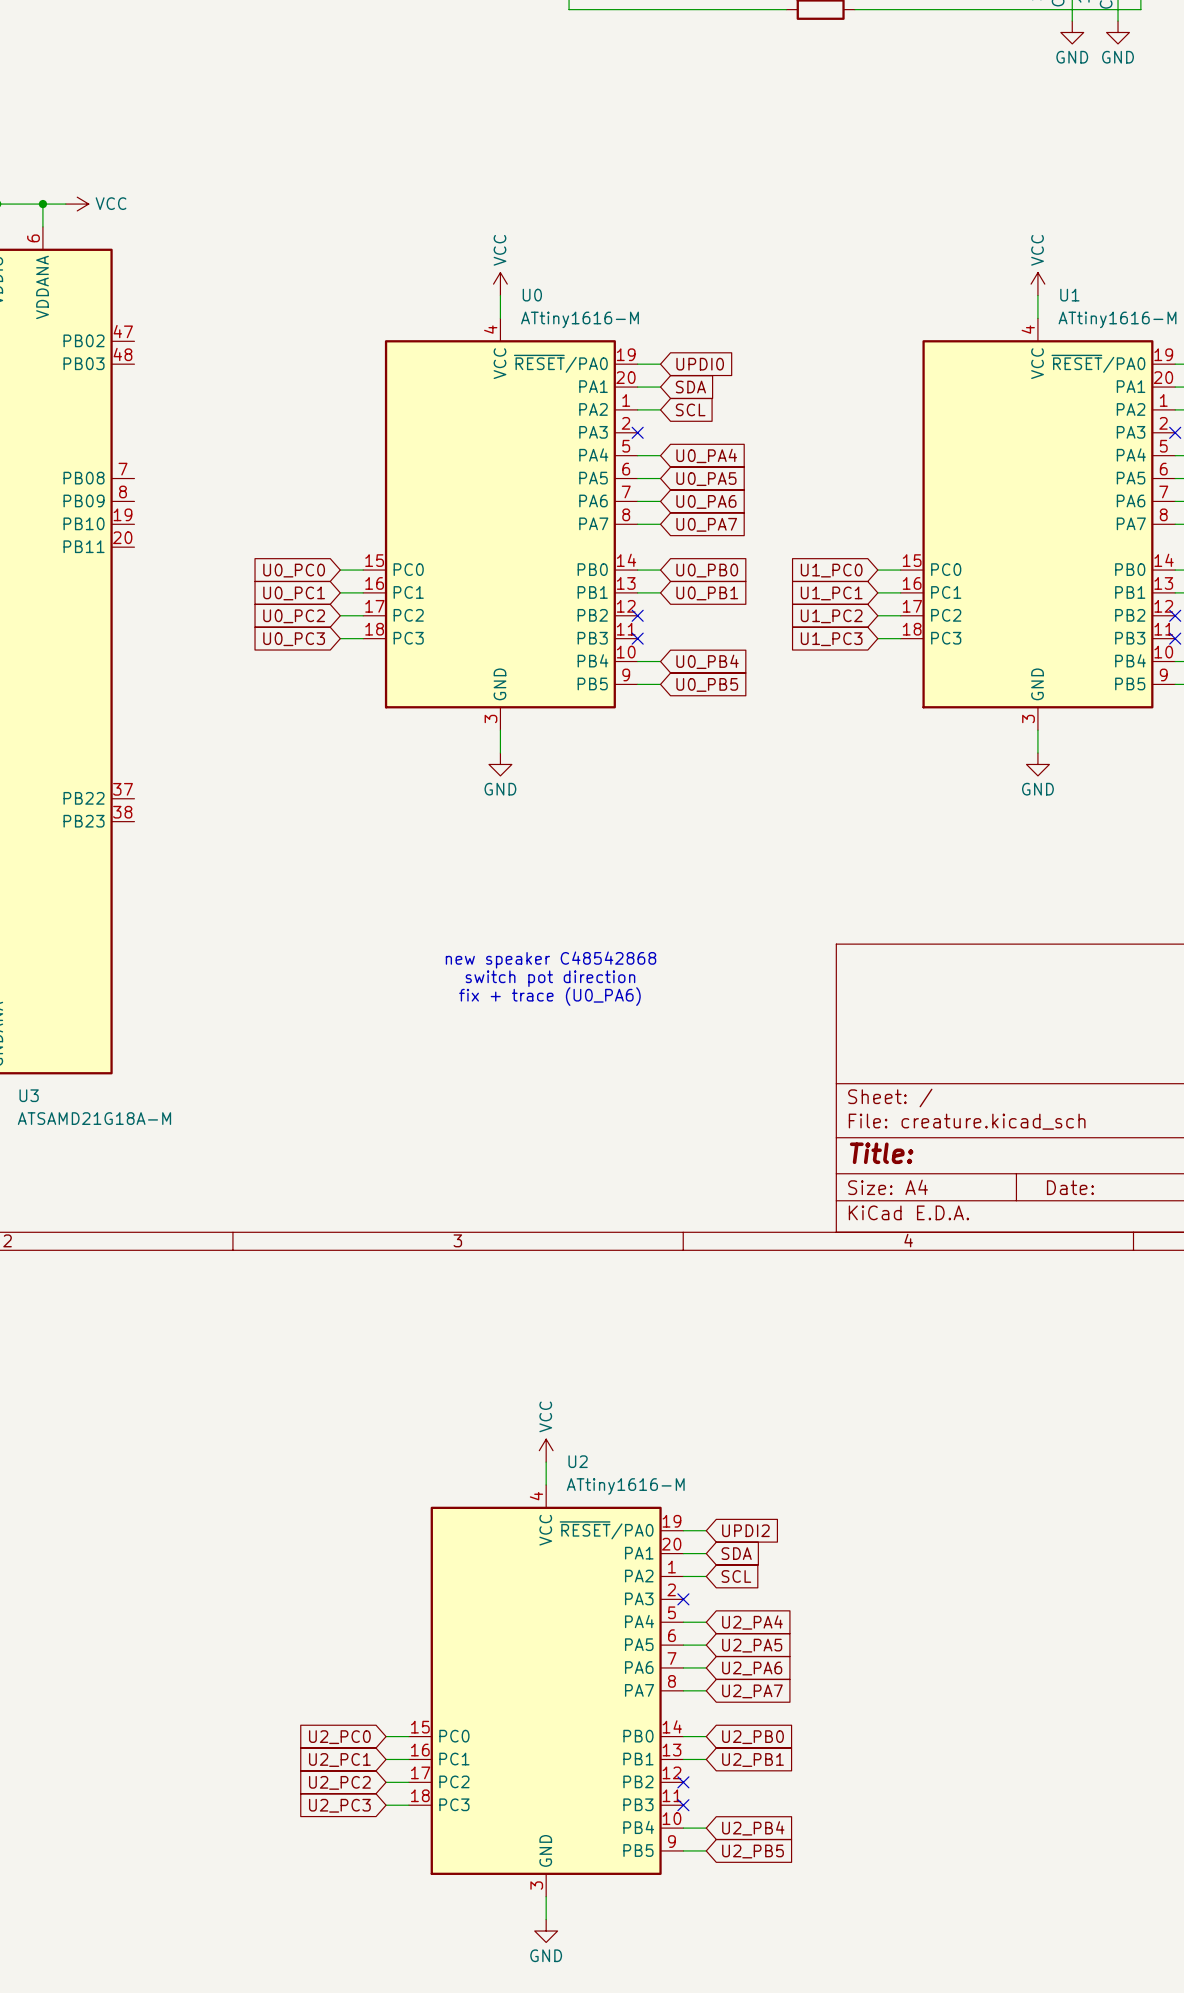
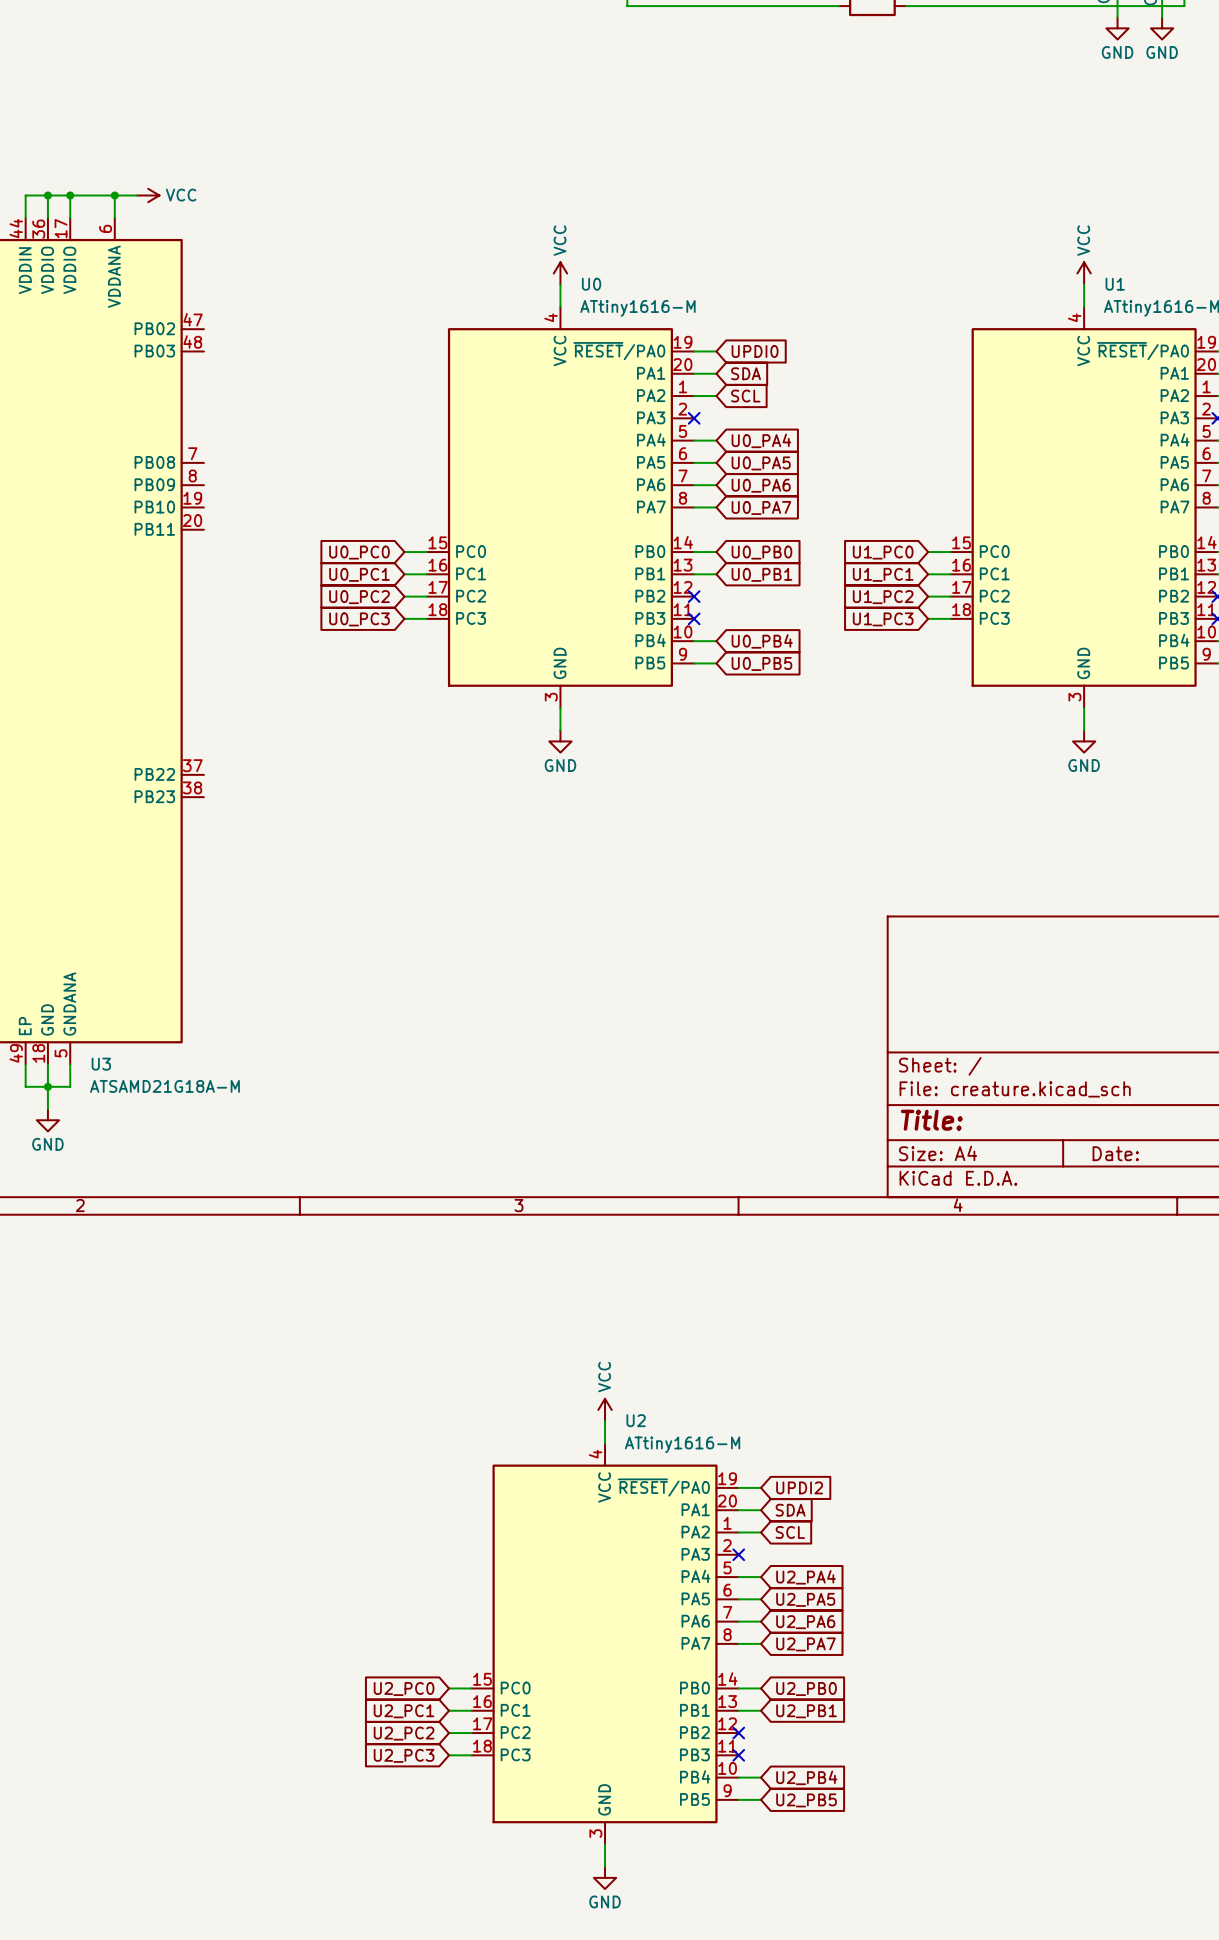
text: new speaker C48542868 (551, 960) -> none
text: switch pot direction (550, 978) -> none
text: fix + trace (U0_PA6) (549, 996) -> none

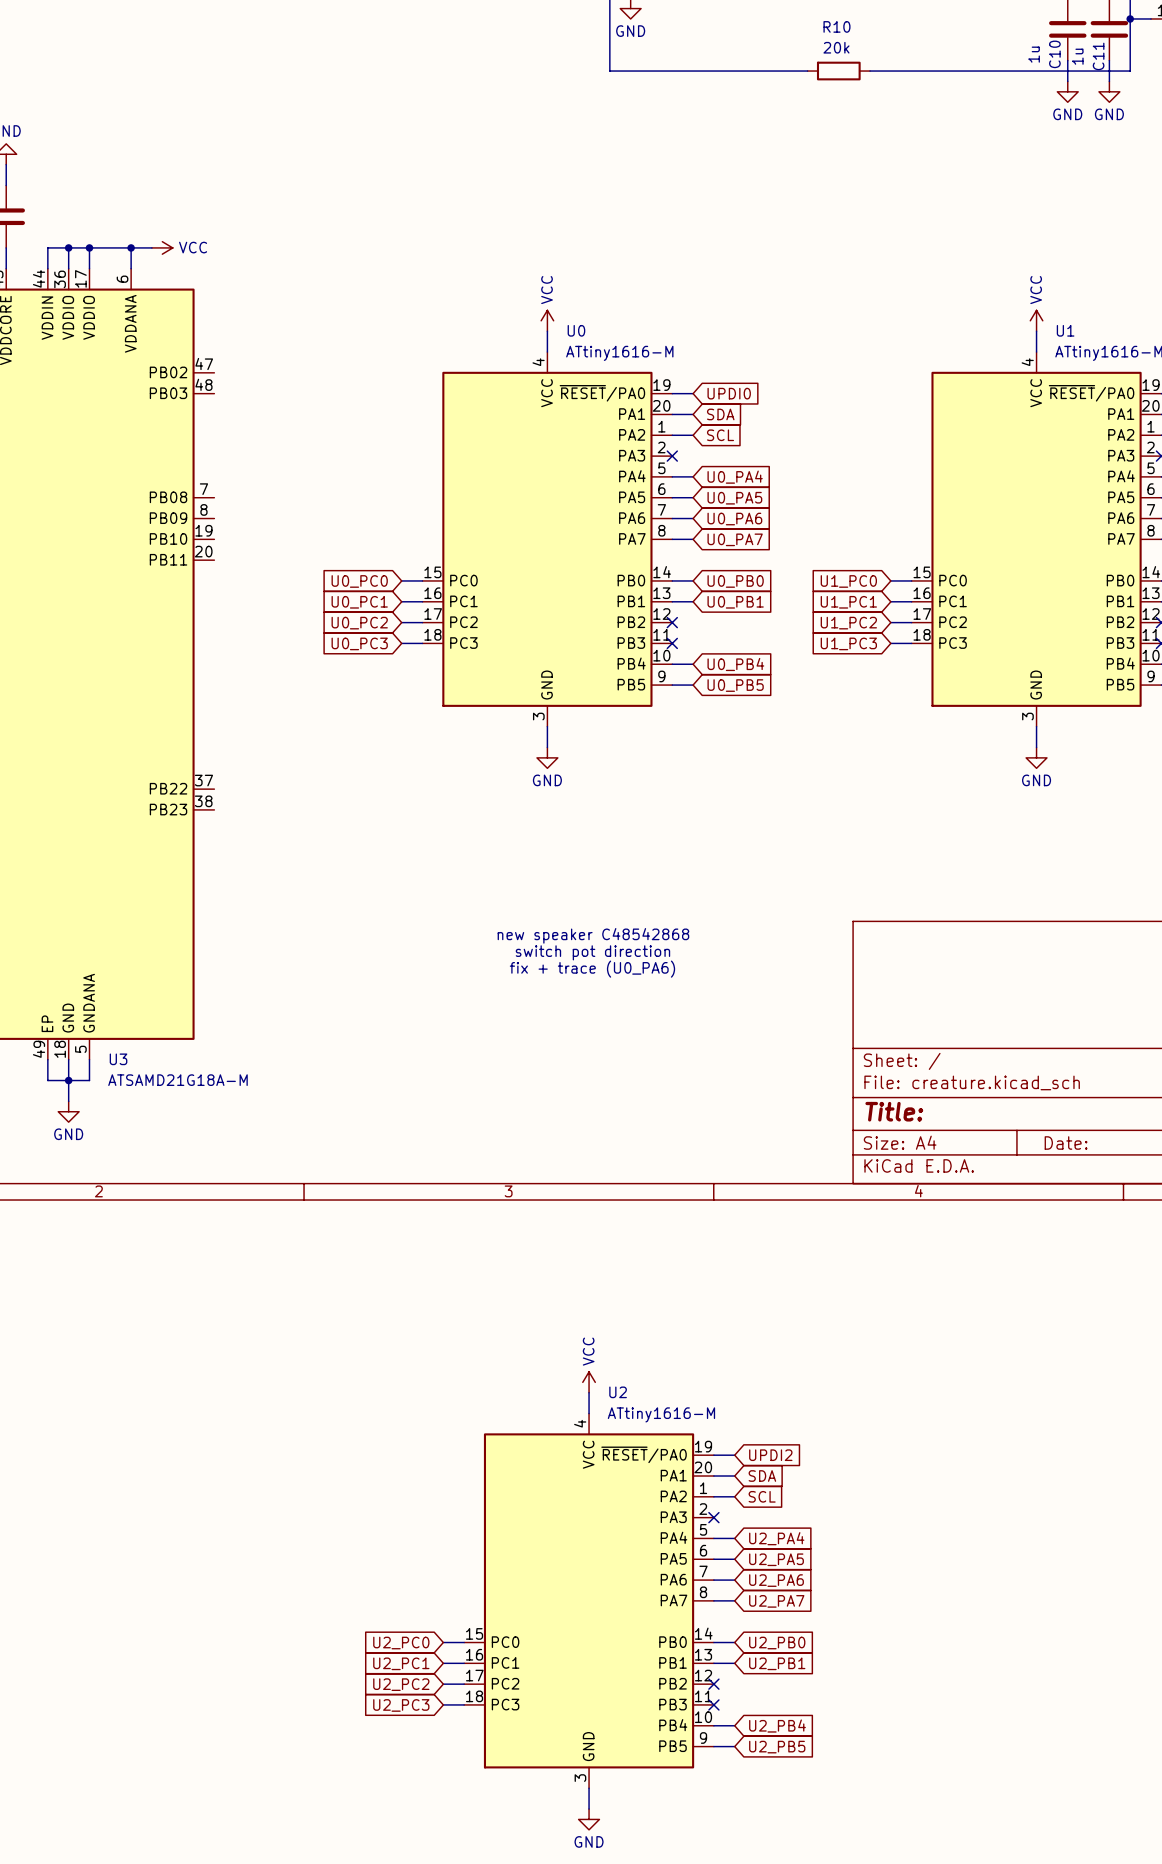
text: none -> new speaker C48542868 (593, 935)
text: none -> switch pot direction (592, 952)
text: none -> fix + trace (U0_PA6) (592, 969)

